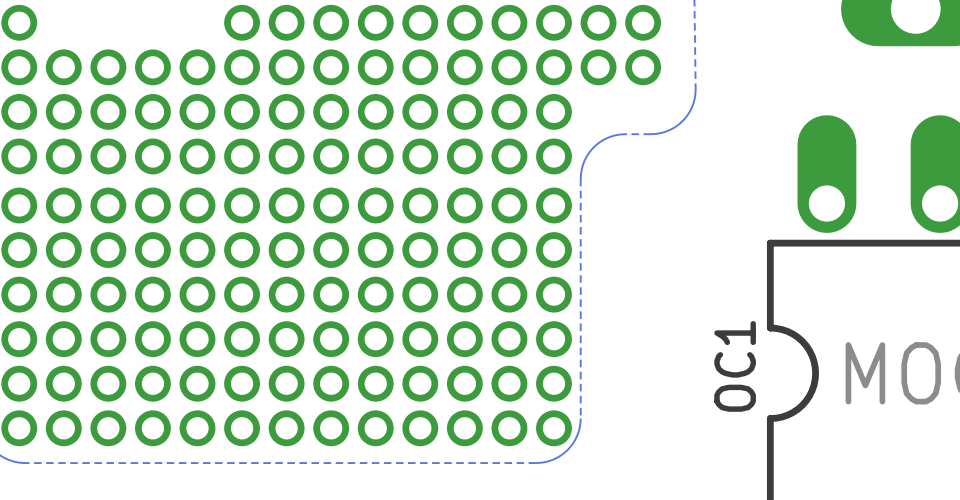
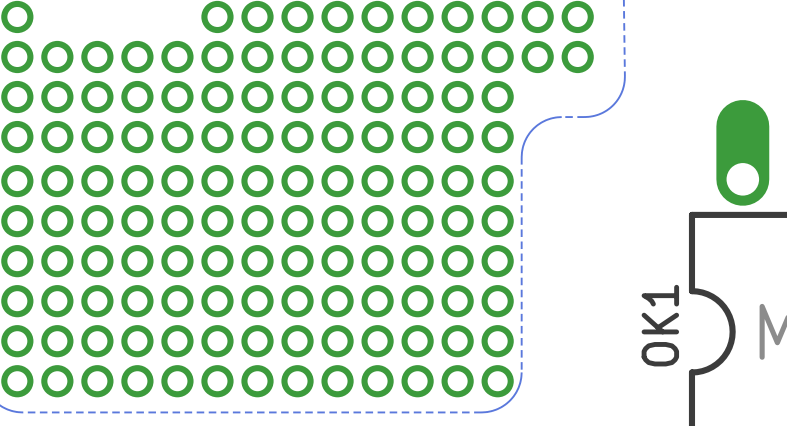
OC1 name: OC1 (735, 366) -> OK1 (660, 325)

